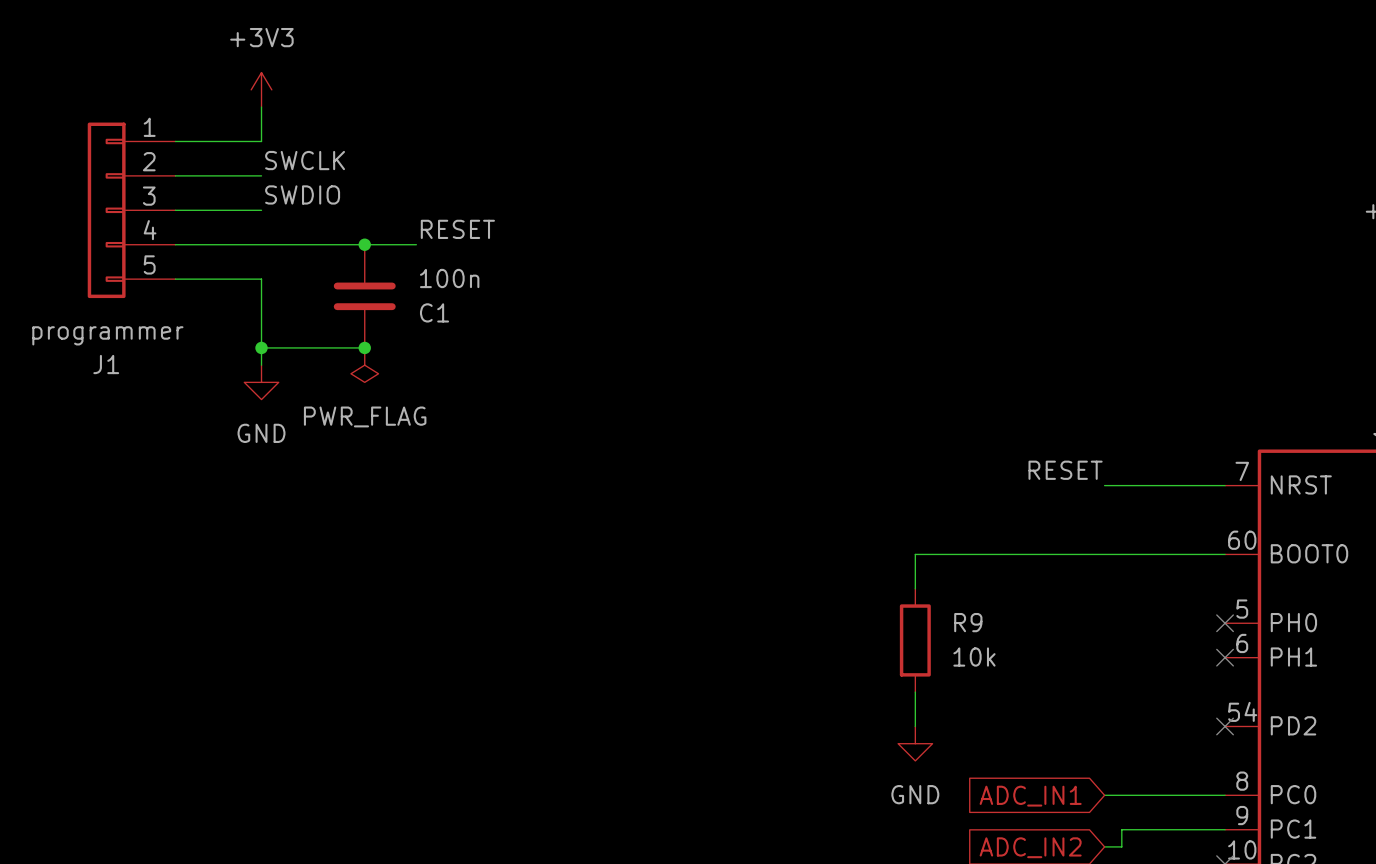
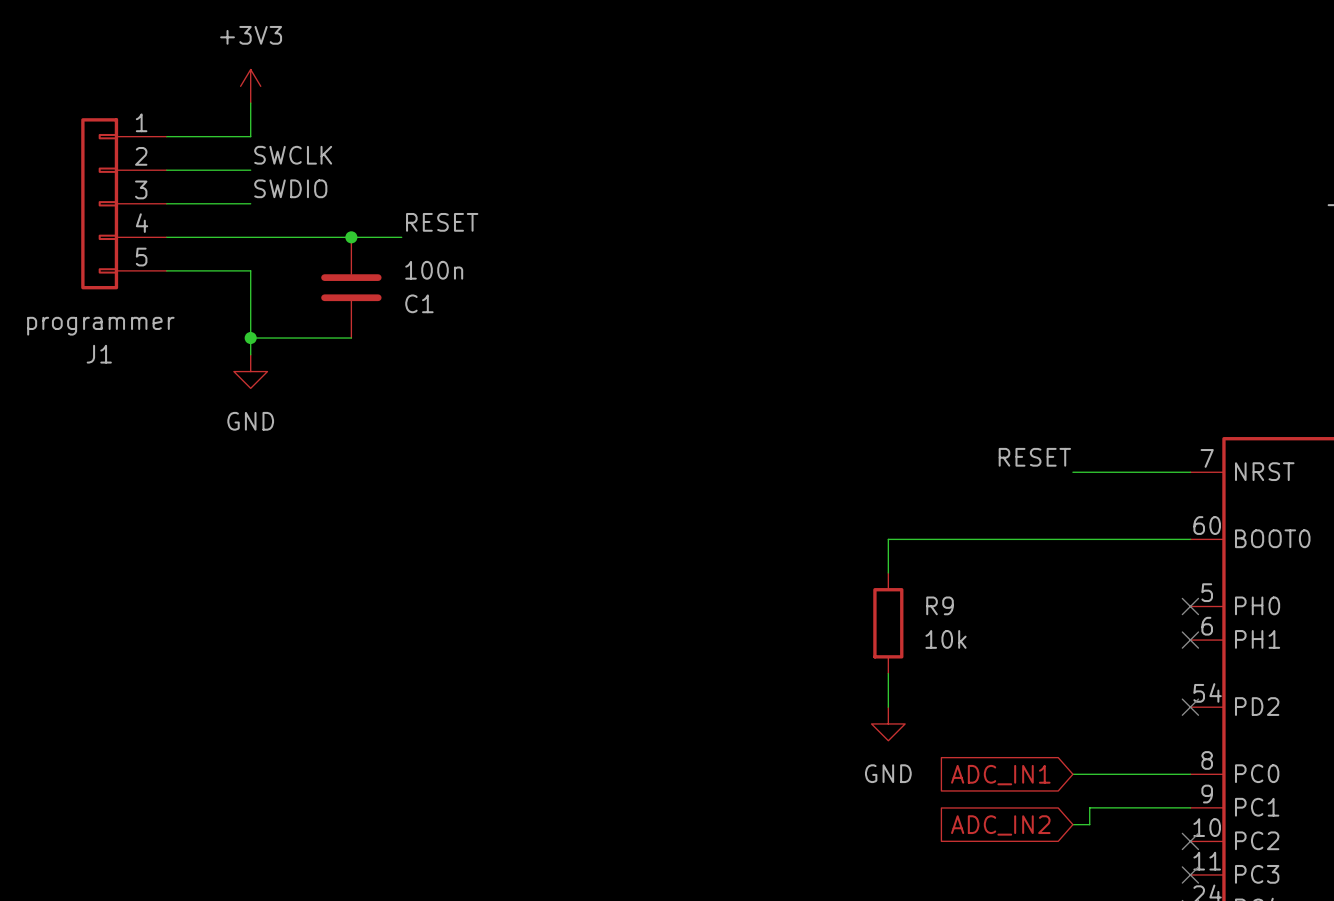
junction: (364, 347) -> none
power symbol: PWR_FLAG (364, 365) -> none

